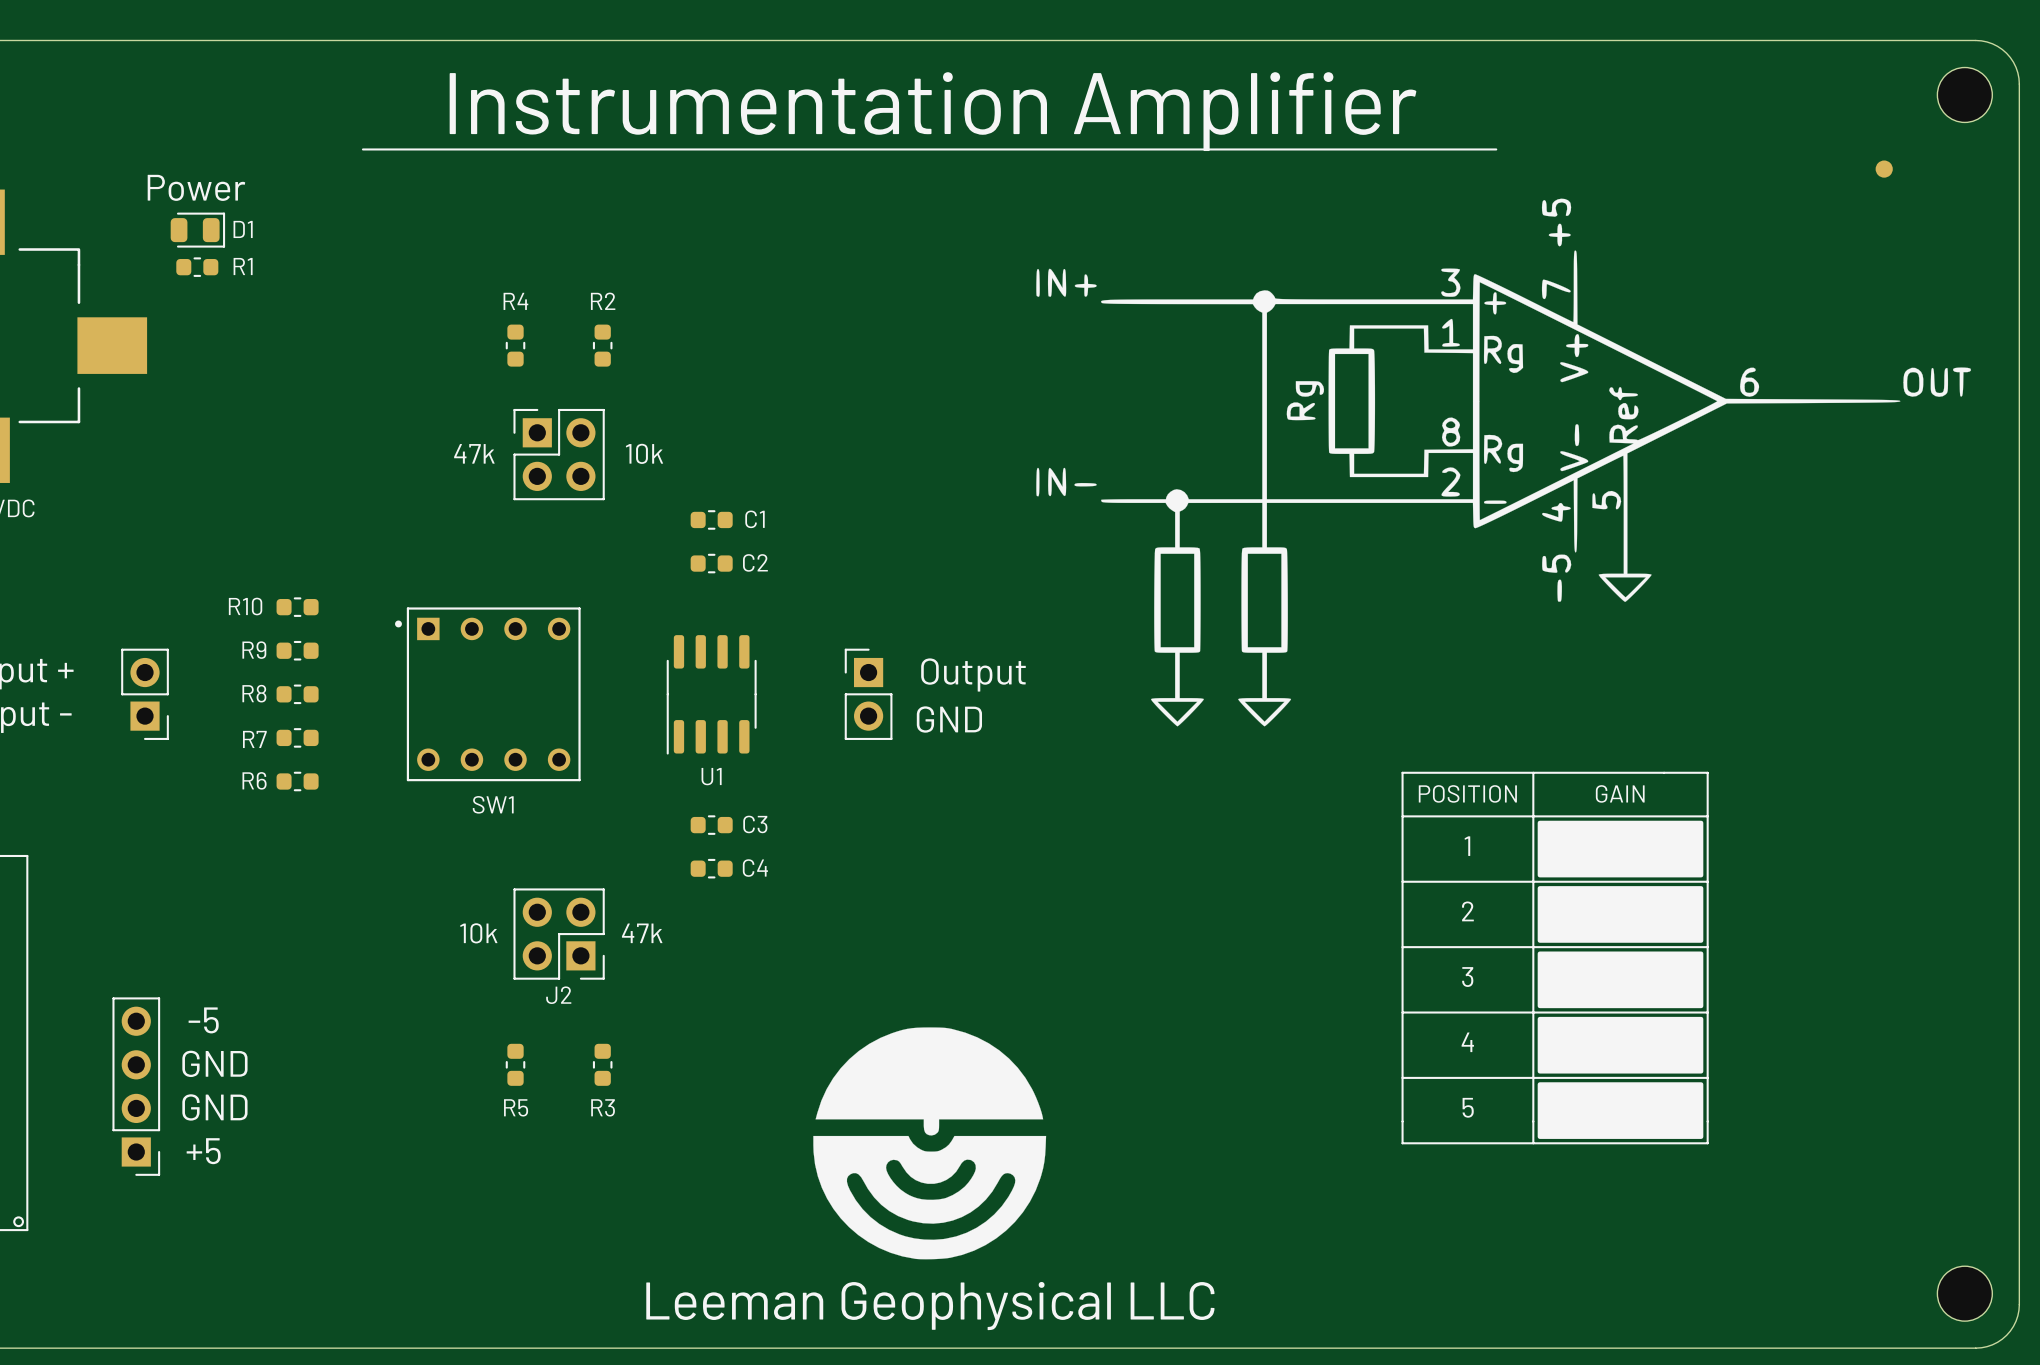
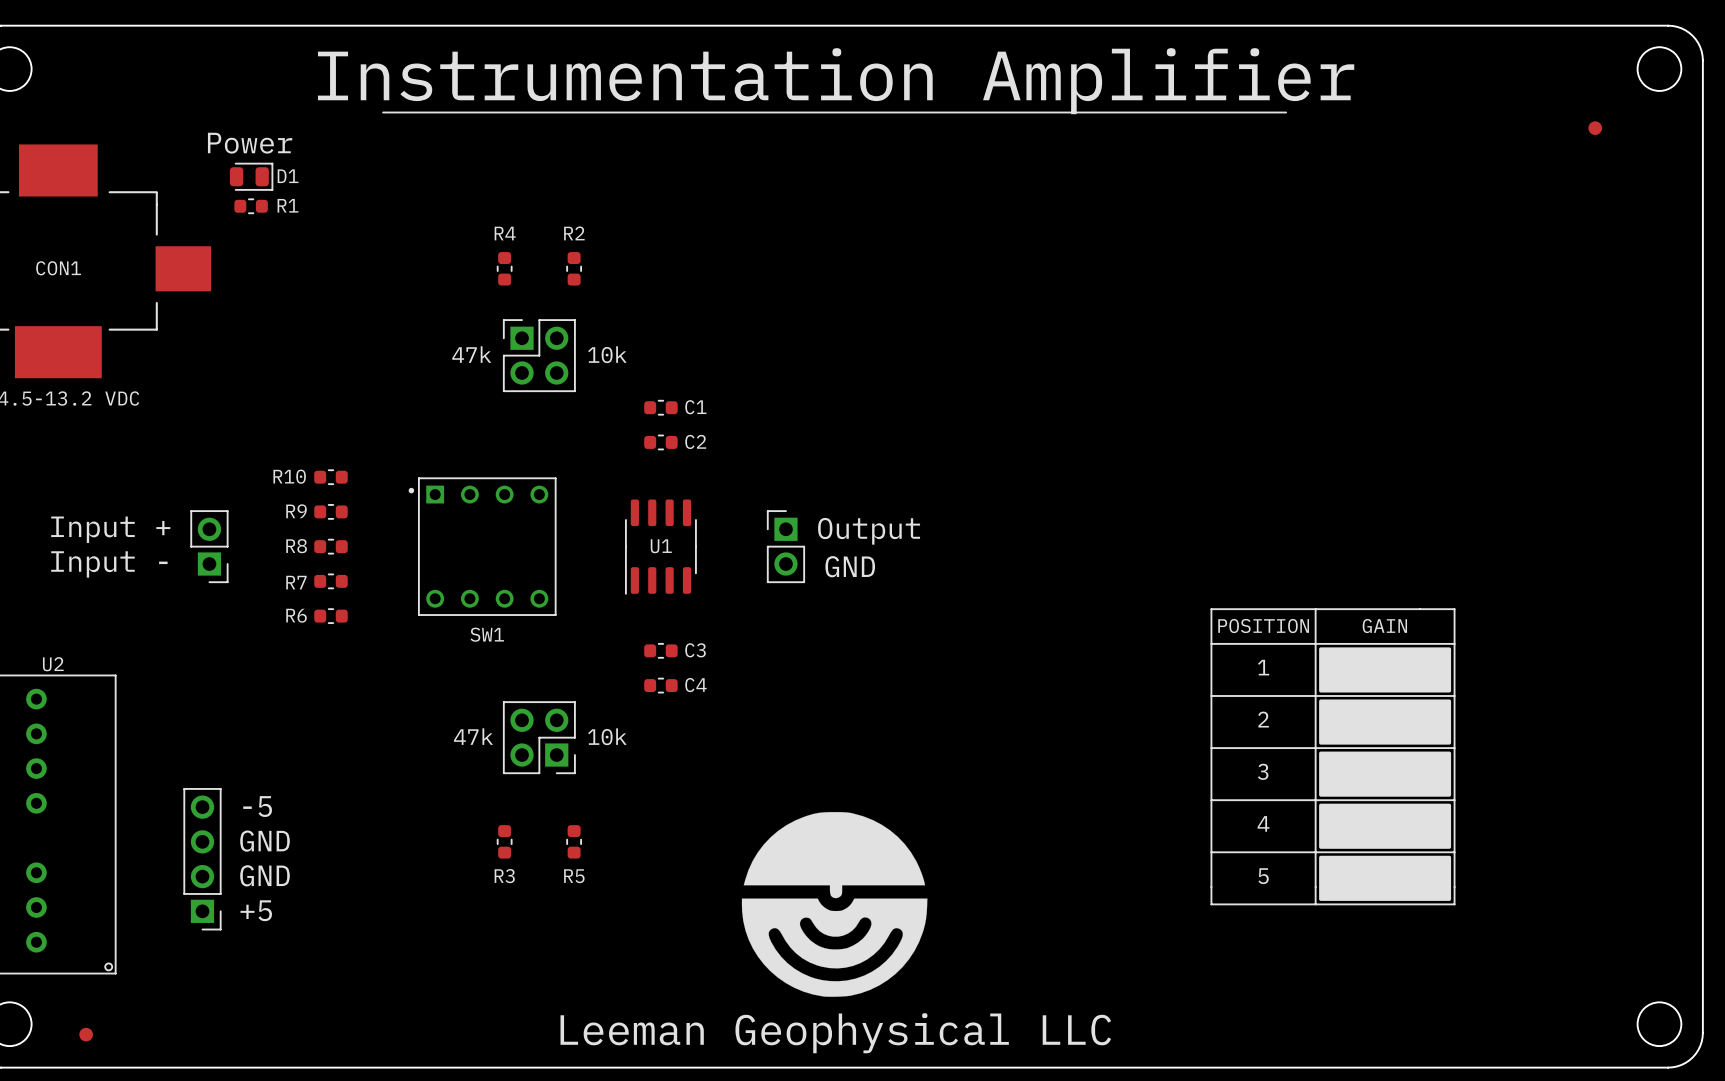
drawing: [1036, 198, 1972, 727] -> none
U1 name position: U1 (711, 776) -> U1 (661, 546)
text position: 10k (478, 933) -> 10k (607, 736)
text position: 47k (642, 933) -> 47k (473, 736)
J2 name: J2 (558, 995) -> none
R5 name: R5 (516, 1107) -> R3 (504, 876)
R3 name: R3 (603, 1107) -> R5 (574, 876)

